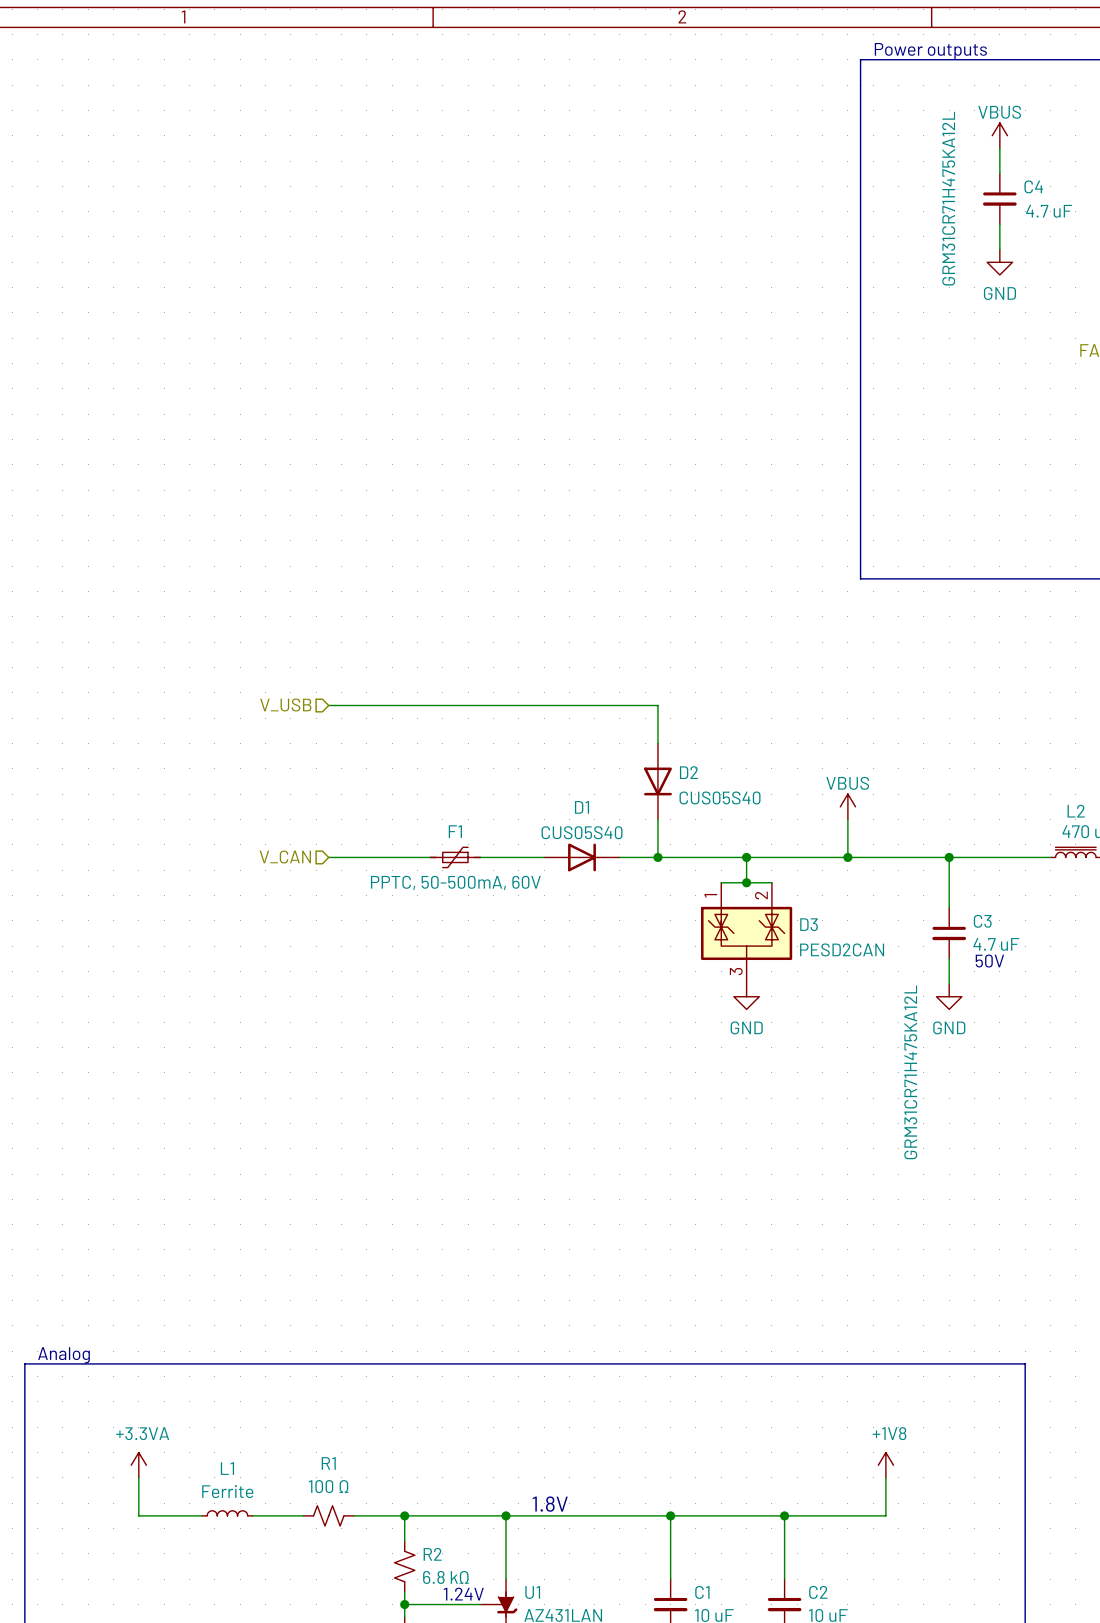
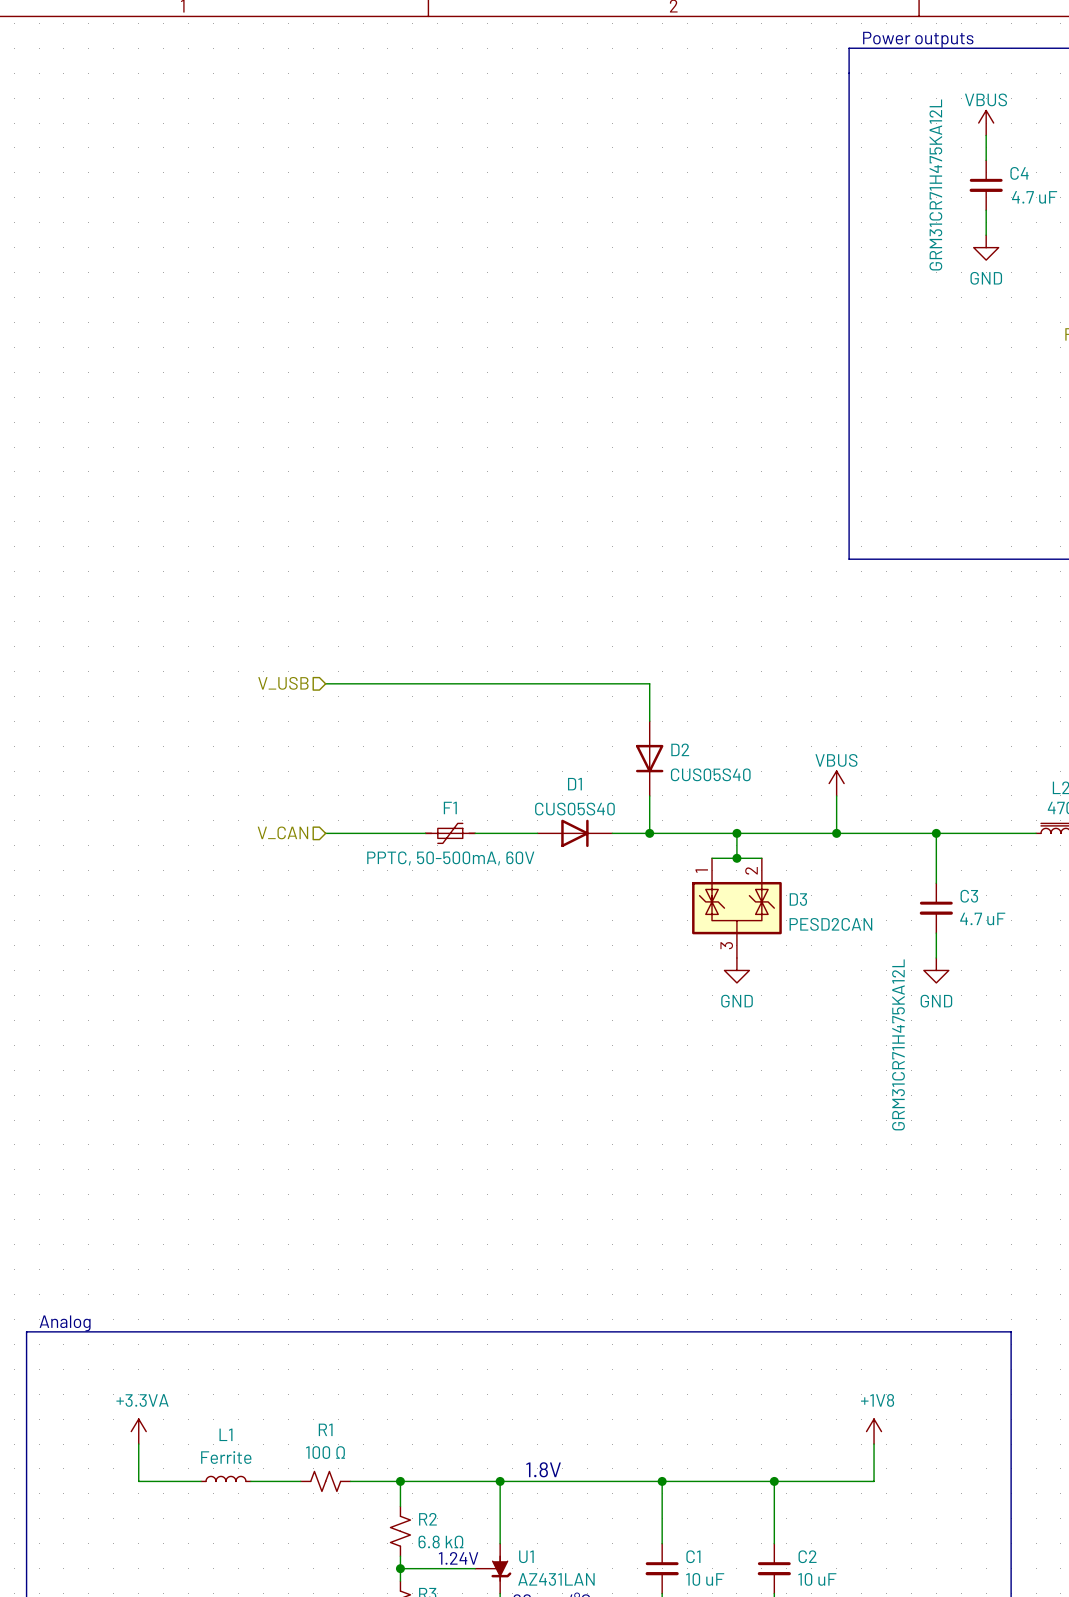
text: 50V (989, 961) -> none

